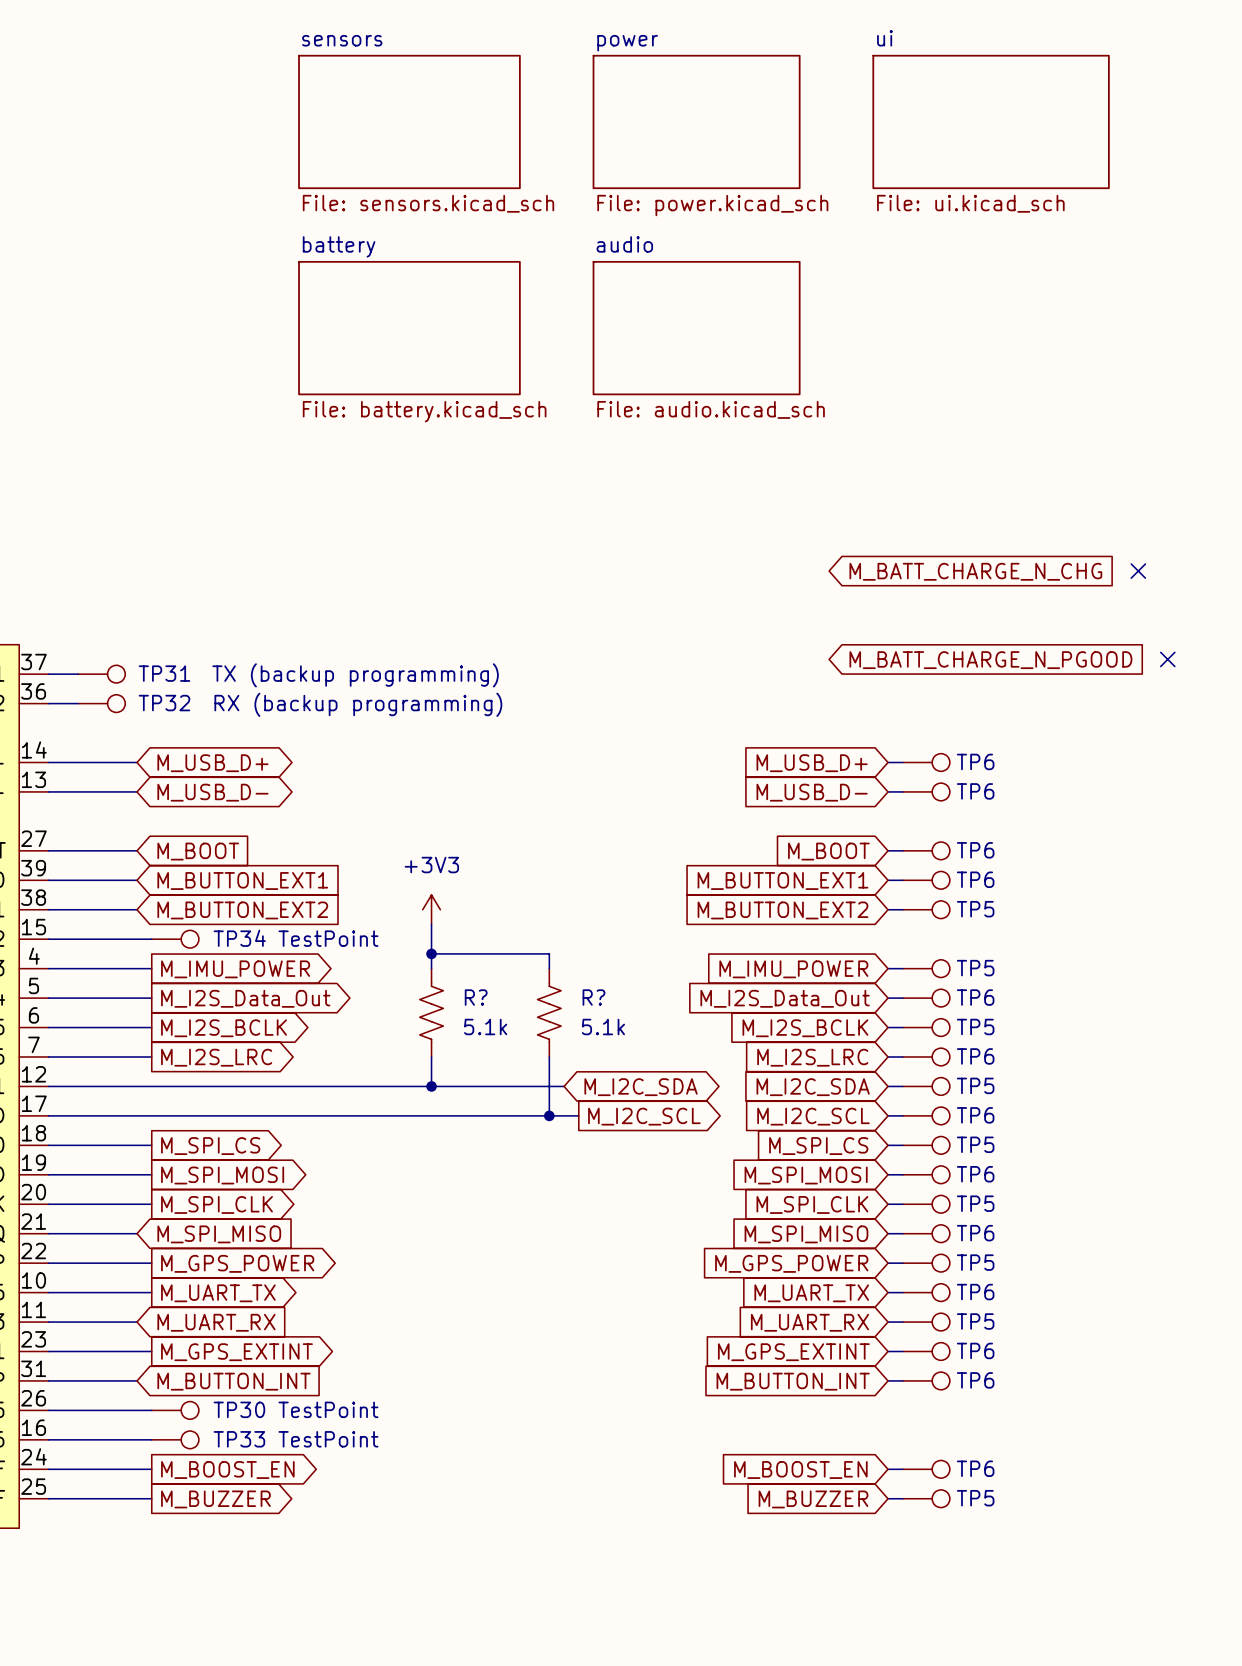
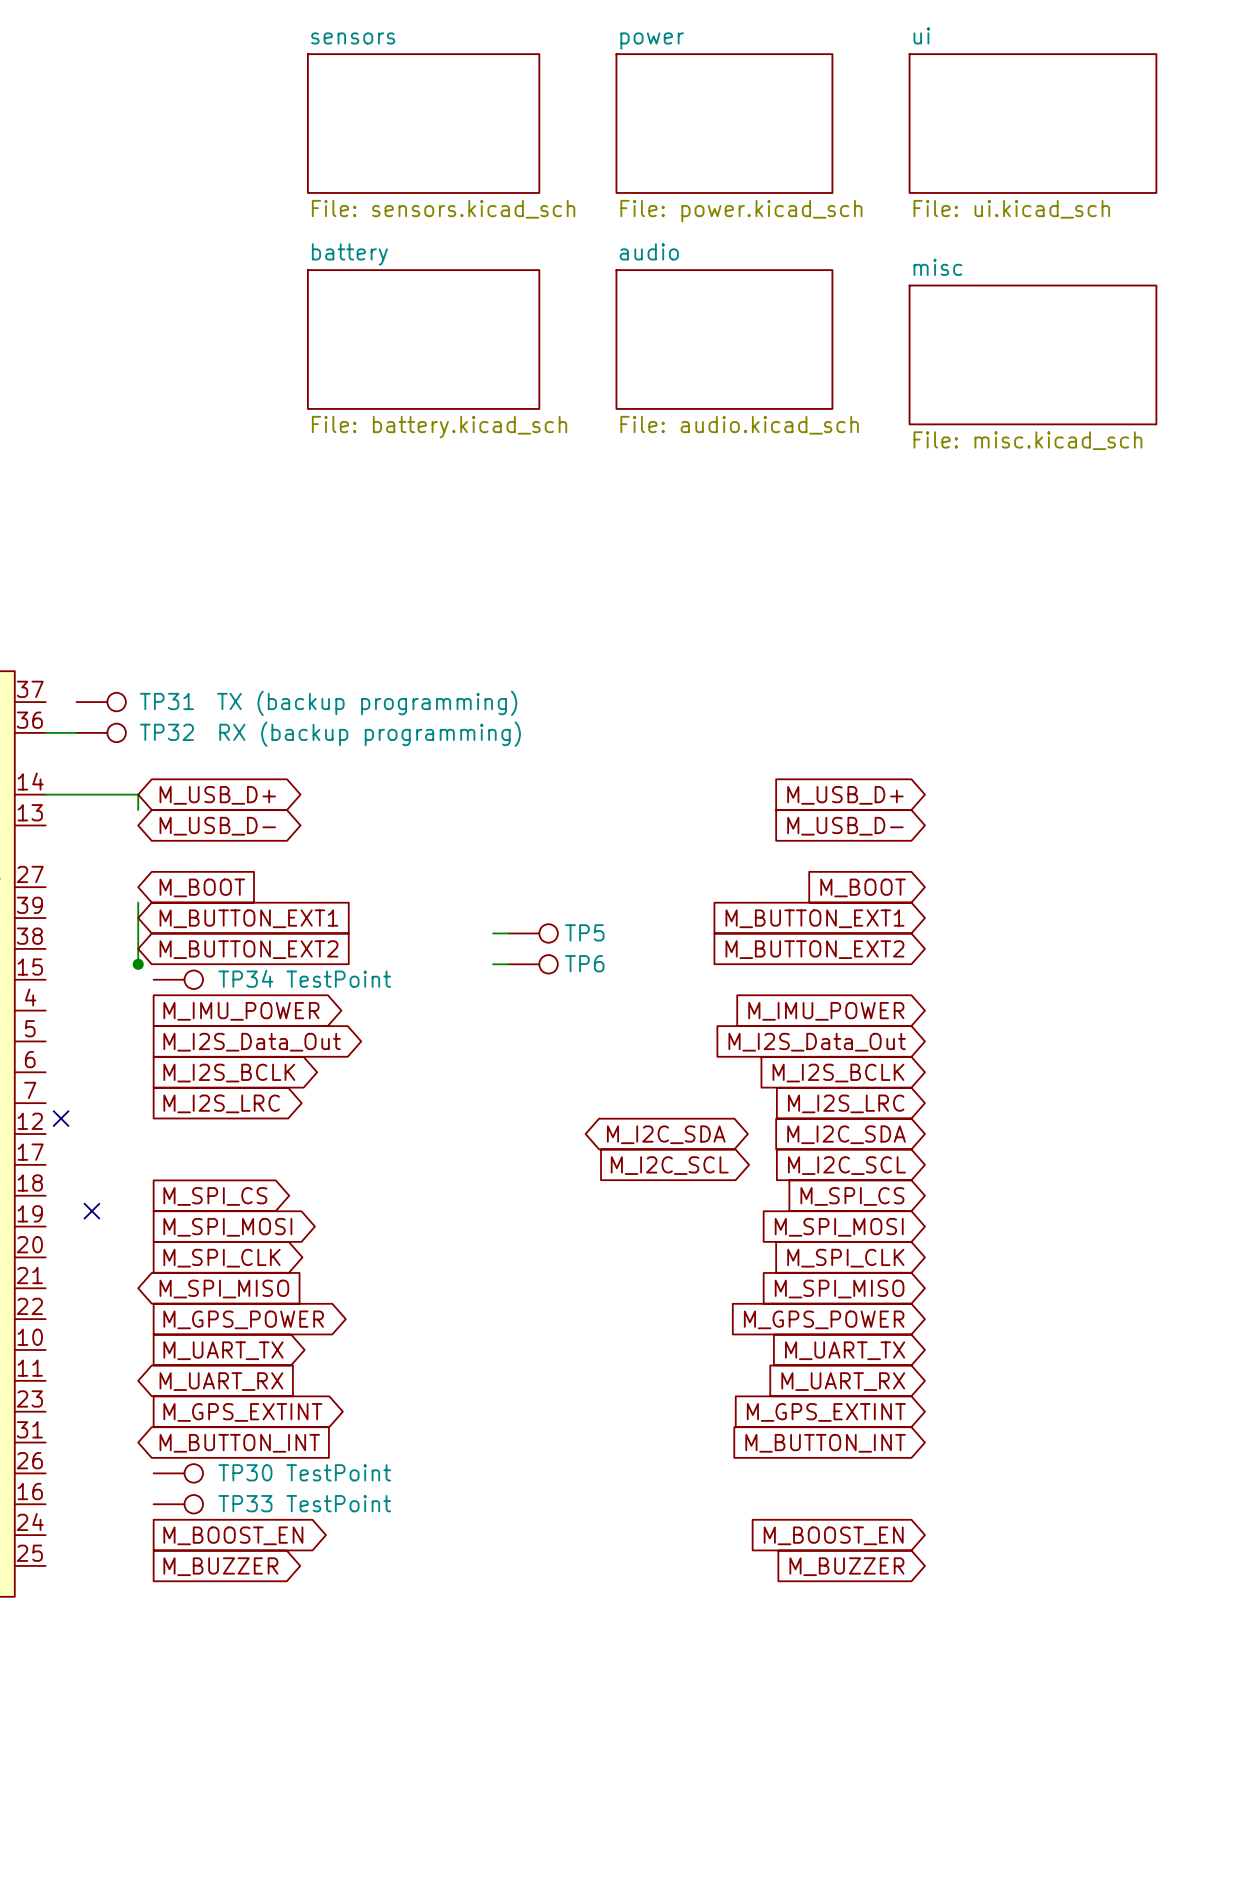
sheet misc: none -> File: misc.kicad_sch (1032, 354)
global label: M_BATT_CHARGE_N_CHG (975, 571) -> none
no-connect mark: (1138, 571) -> none
no-connect mark: (1167, 659) -> none
global label: M_BATT_CHARGE_N_PGOOD (990, 660) -> none
wire: (48, 674) (78, 674) -> none
wire: none -> (138, 794) (138, 810)
wire: (888, 762) (902, 762) -> none
TP6: (926, 762) -> none
wire: (48, 791) (137, 791) -> none
wire: (888, 791) (902, 791) -> none
TP6: (926, 791) -> none
wire: (48, 850) (137, 850) -> none
wire: (888, 850) (902, 850) -> none
TP6: (926, 850) -> none
wire: none -> (138, 902) (138, 964)
wire: (48, 880) (137, 880) -> none
wire: (888, 880) (902, 880) -> none
TP6: (926, 880) -> none
wire: none -> (493, 933) (508, 933)
TP5: none -> (533, 933)
wire: (48, 909) (137, 909) -> none
power symbol: +3V3 (431, 909) -> none
wire: (888, 909) (902, 909) -> none
TP5: (926, 909) -> none
junction: none -> (138, 964)
wire: (431, 924) (431, 968) -> none
wire: none -> (493, 964) (508, 964)
TP6: none -> (533, 964)
wire: (48, 939) (151, 939) -> none
wire: (431, 953) (549, 953) (549, 968) -> none
junction: (431, 953) -> none
wire: (48, 968) (151, 968) -> none
wire: (888, 968) (902, 968) -> none
TP5: (926, 968) -> none
wire: (48, 998) (151, 998) -> none
wire: (888, 998) (902, 998) -> none
TP6: (926, 998) -> none
R?: 5.1k (431, 1012) -> none
R?: 5.1k (549, 1012) -> none
wire: (48, 1027) (151, 1027) -> none
wire: (888, 1027) (902, 1027) -> none
TP5: (926, 1027) -> none
wire: (48, 1057) (151, 1057) -> none
wire: (431, 1057) (431, 1086) -> none
wire: (549, 1057) (549, 1115) -> none
wire: (888, 1057) (902, 1057) -> none
TP6: (926, 1057) -> none
no-connect mark: none -> (61, 1118)
wire: (48, 1086) (564, 1086) -> none
junction: (431, 1086) -> none
wire: (888, 1086) (902, 1086) -> none
TP5: (926, 1086) -> none
wire: (48, 1115) (578, 1115) -> none
junction: (549, 1115) -> none
wire: (888, 1115) (902, 1115) -> none
TP6: (926, 1115) -> none
wire: (48, 1145) (151, 1145) -> none
wire: (888, 1145) (902, 1145) -> none
TP5: (926, 1145) -> none
no-connect mark: none -> (91, 1211)
wire: (48, 1174) (151, 1174) -> none
wire: (888, 1174) (902, 1174) -> none
TP6: (926, 1174) -> none
wire: (48, 1204) (151, 1204) -> none
wire: (888, 1204) (902, 1204) -> none
TP5: (926, 1204) -> none
wire: (48, 1233) (137, 1233) -> none
wire: (888, 1233) (902, 1233) -> none
TP6: (926, 1233) -> none
wire: (48, 1263) (151, 1263) -> none
wire: (888, 1263) (902, 1263) -> none
TP5: (926, 1263) -> none
wire: (48, 1292) (151, 1292) -> none
wire: (888, 1292) (902, 1292) -> none
TP6: (926, 1292) -> none
wire: (48, 1322) (137, 1322) -> none
wire: (888, 1322) (902, 1322) -> none
TP5: (926, 1322) -> none
wire: (48, 1351) (151, 1351) -> none
wire: (888, 1351) (902, 1351) -> none
TP6: (926, 1351) -> none
wire: (48, 1380) (137, 1380) -> none
wire: (888, 1380) (902, 1380) -> none
TP6: (926, 1380) -> none
wire: (48, 1410) (151, 1410) -> none
wire: (48, 1439) (151, 1439) -> none
wire: (48, 1469) (151, 1469) -> none
wire: (888, 1469) (902, 1469) -> none
TP6: (926, 1469) -> none
wire: (48, 1498) (151, 1498) -> none
wire: (888, 1498) (902, 1498) -> none
TP5: (926, 1498) -> none

